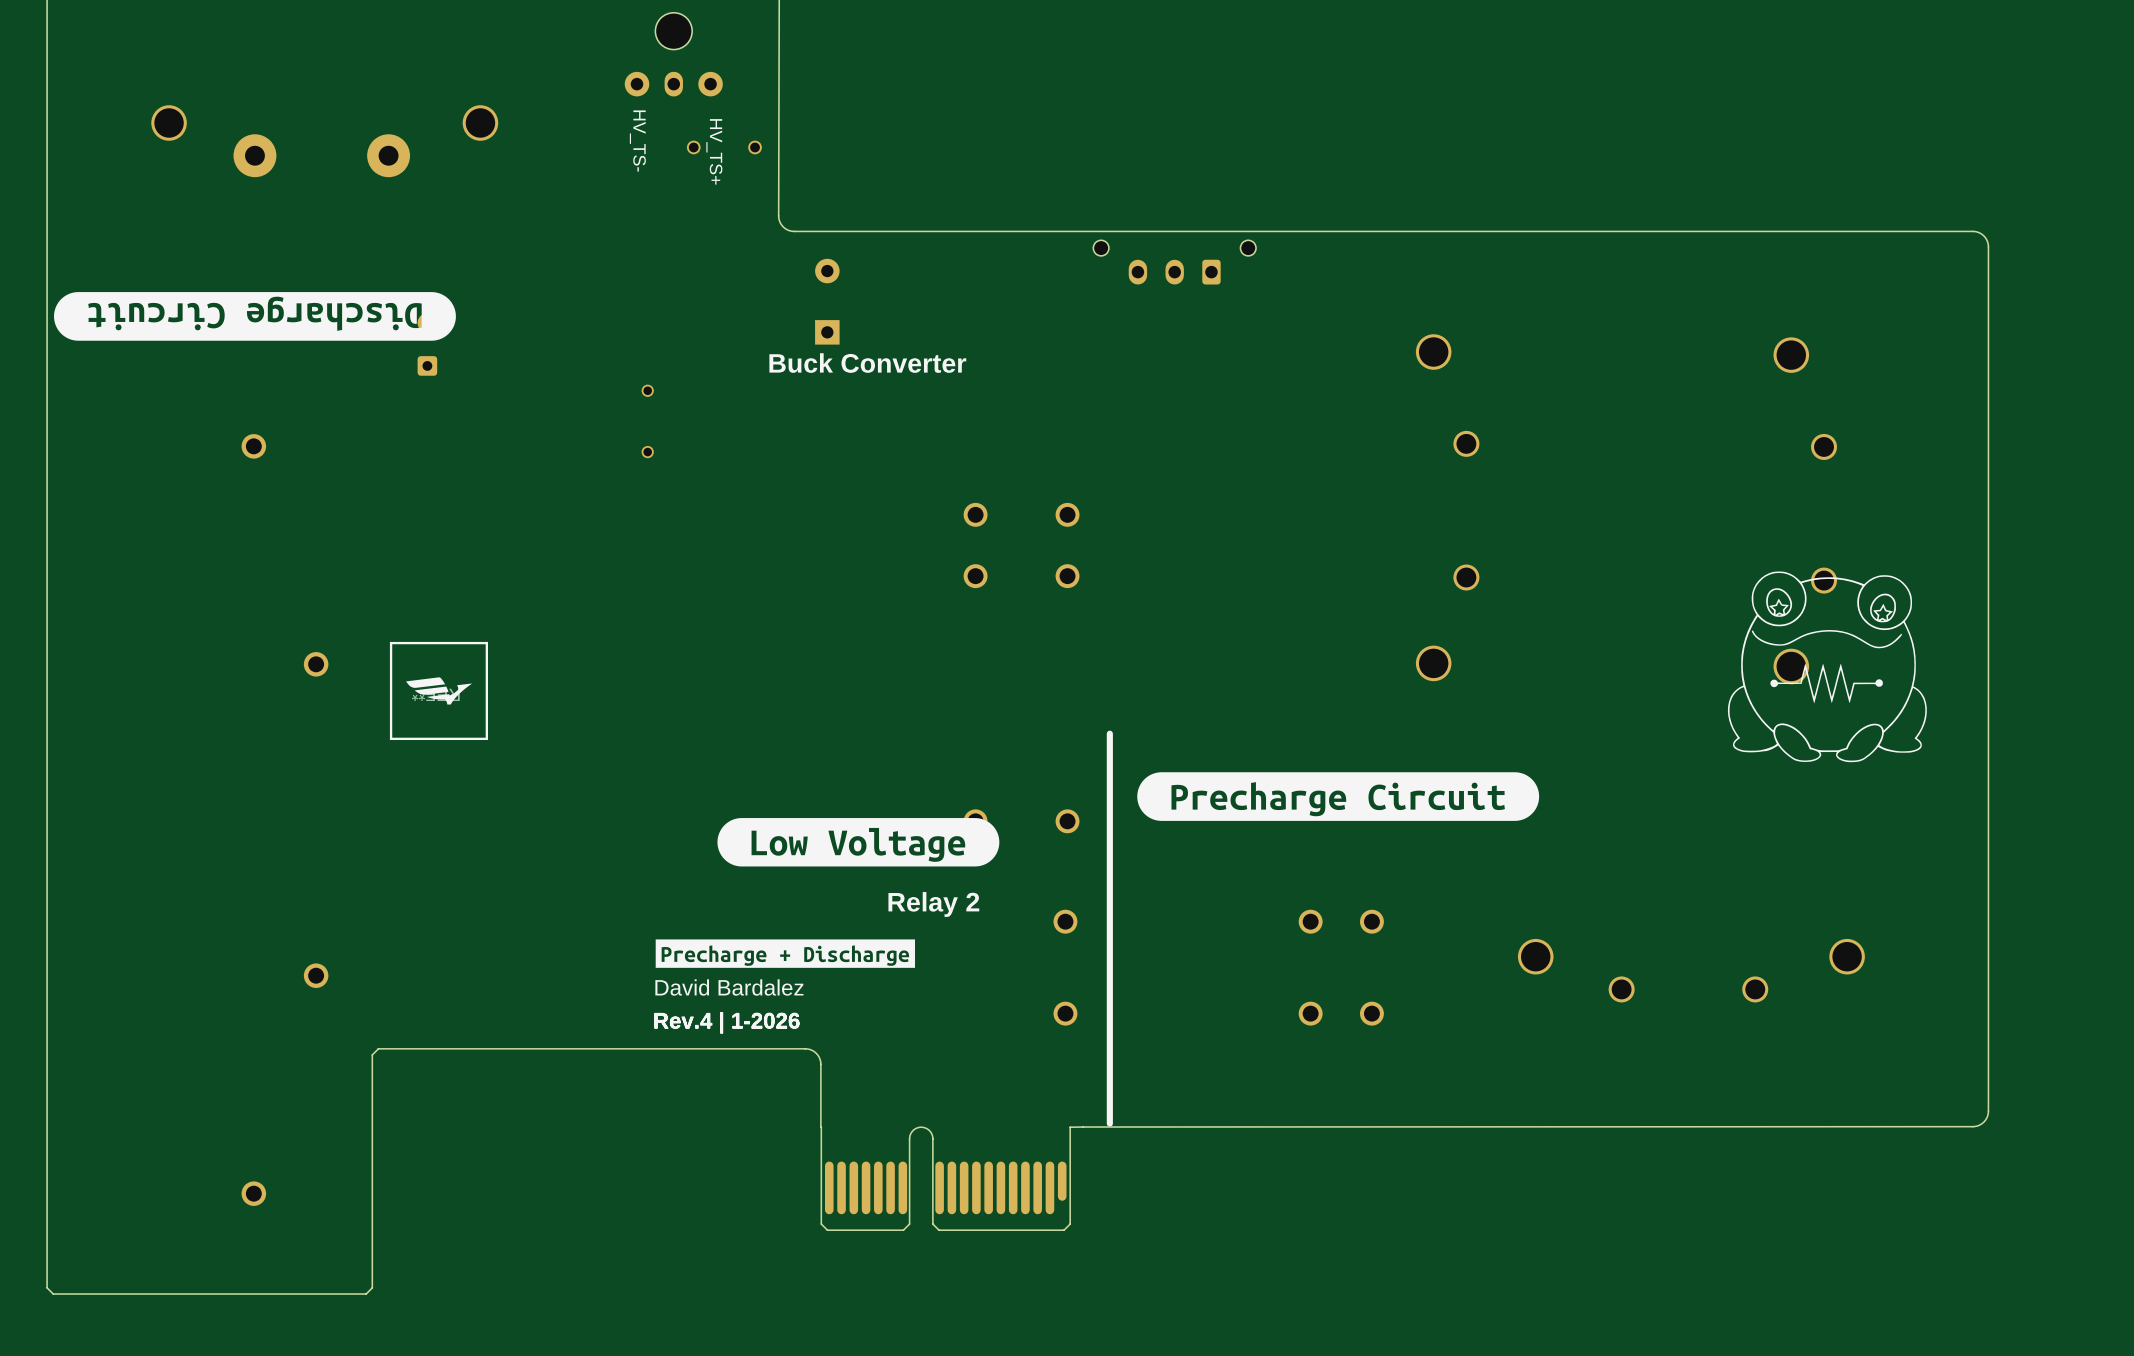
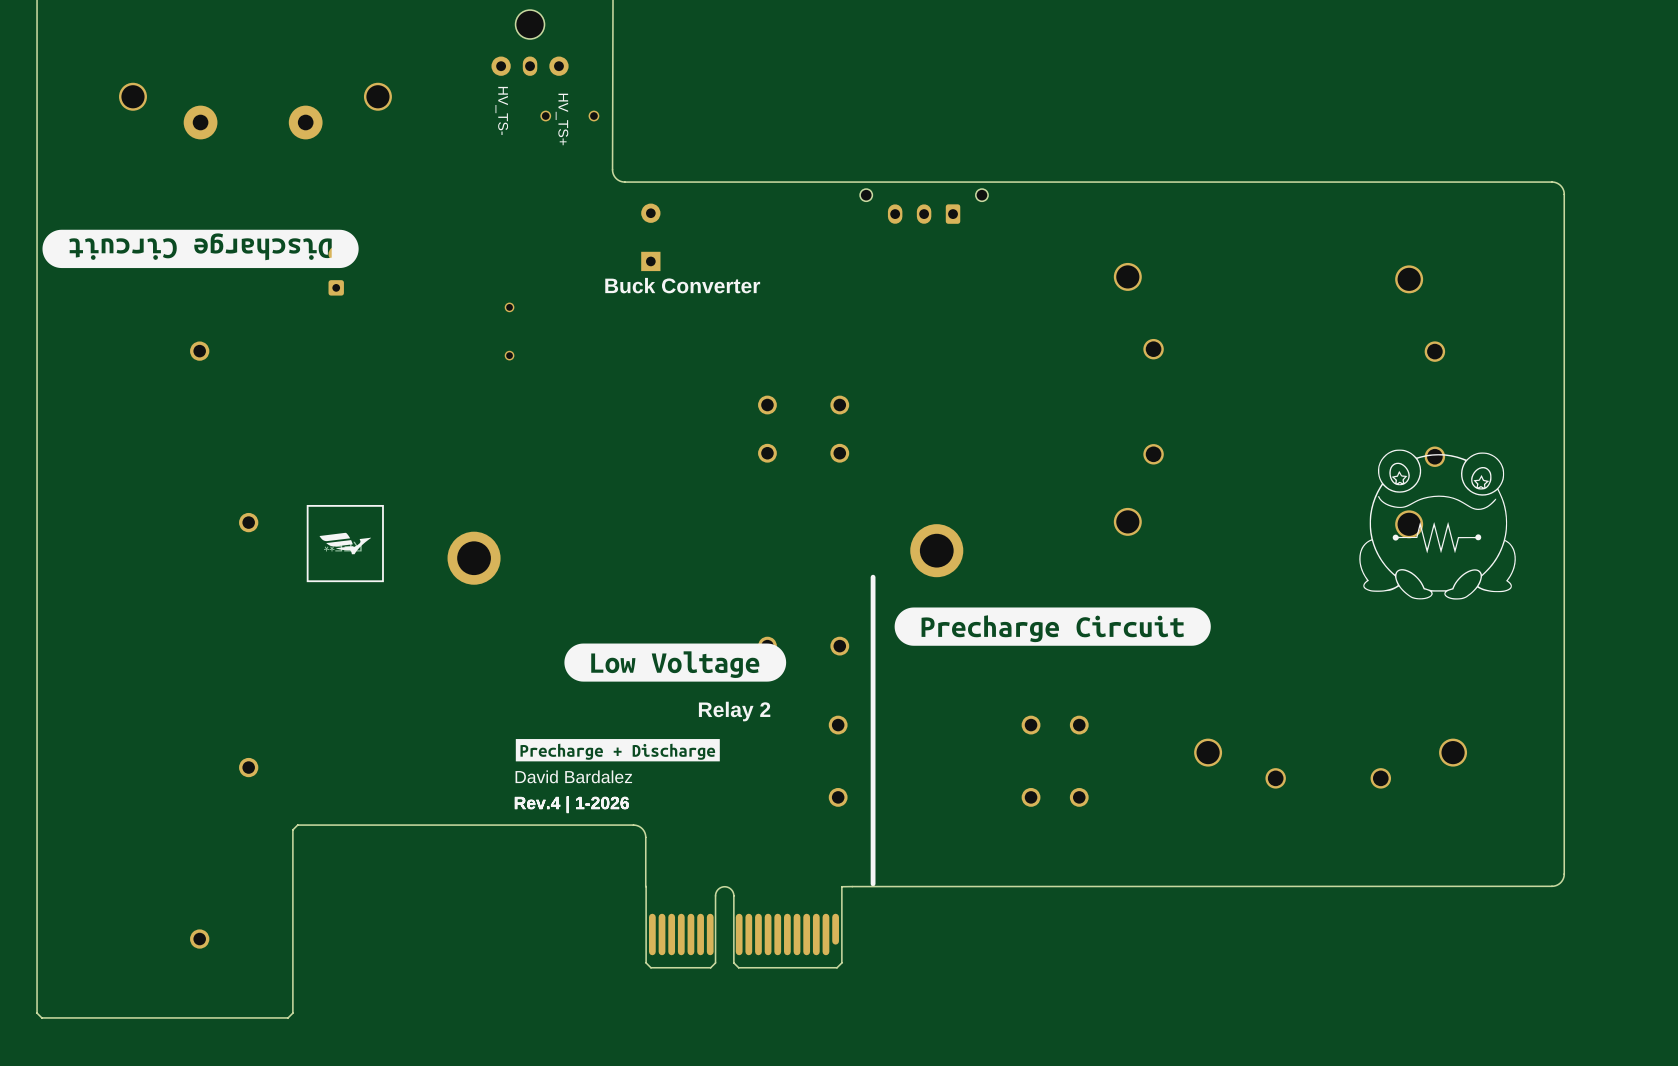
part: none -> (936, 550)
part: none -> (474, 558)

